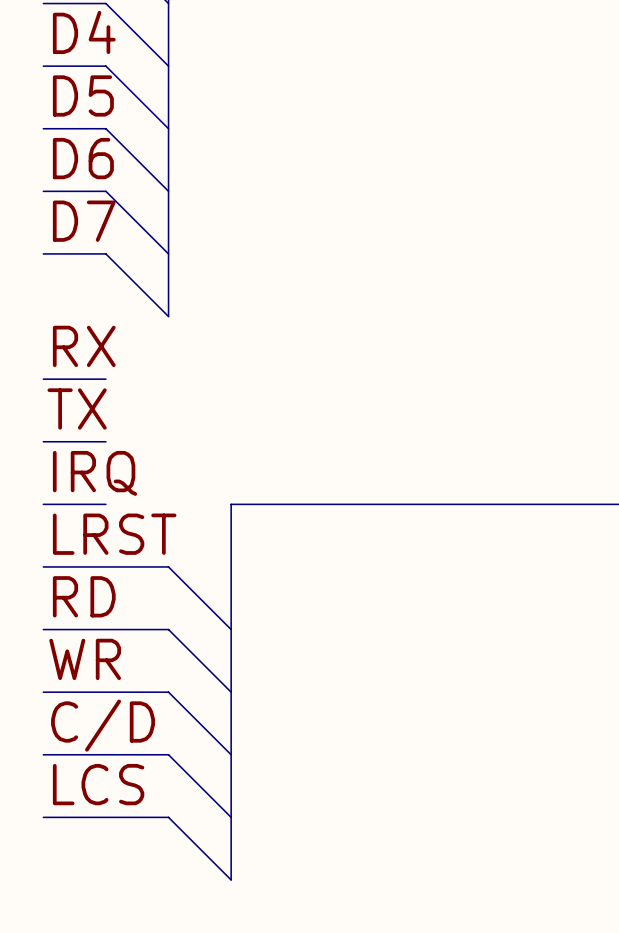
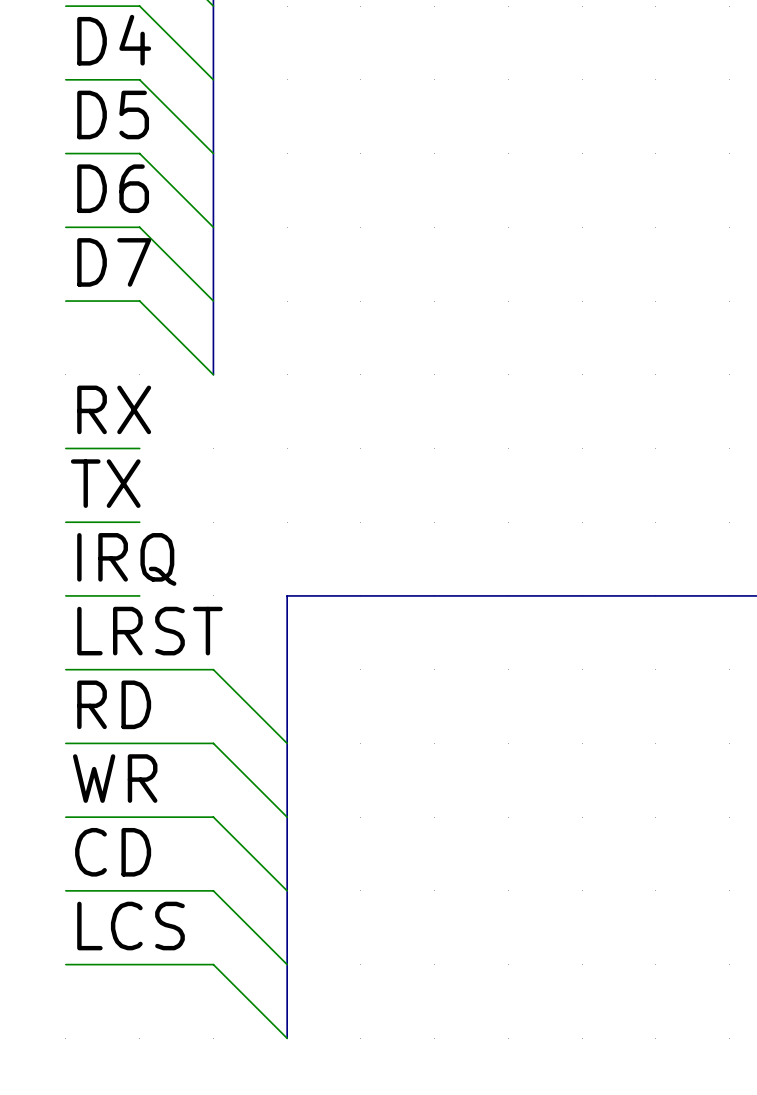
label: C/D (103, 725) -> CD (113, 852)

